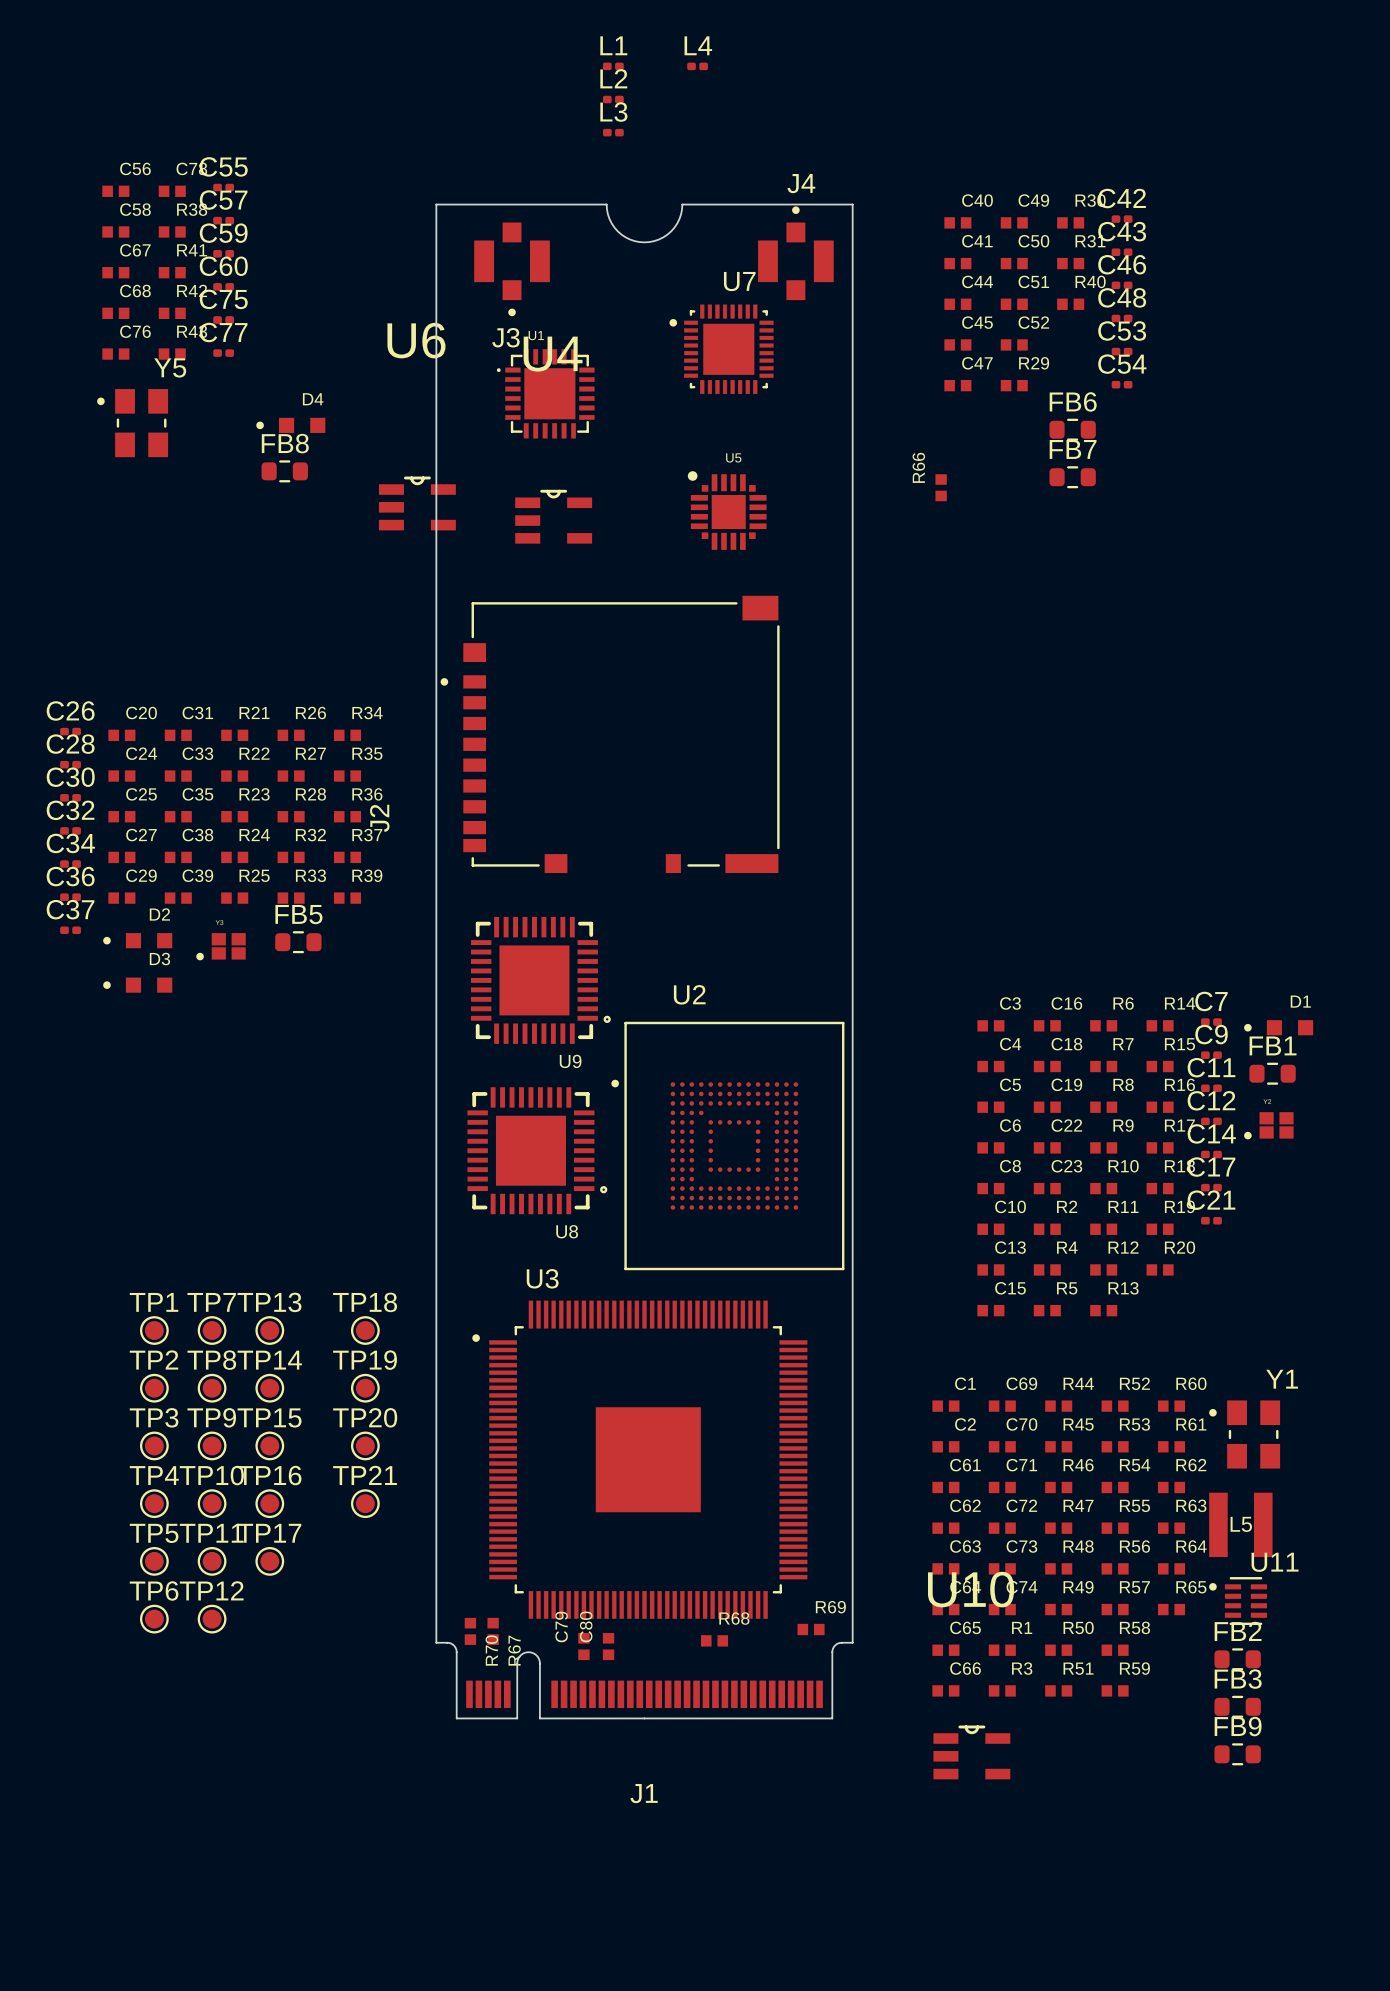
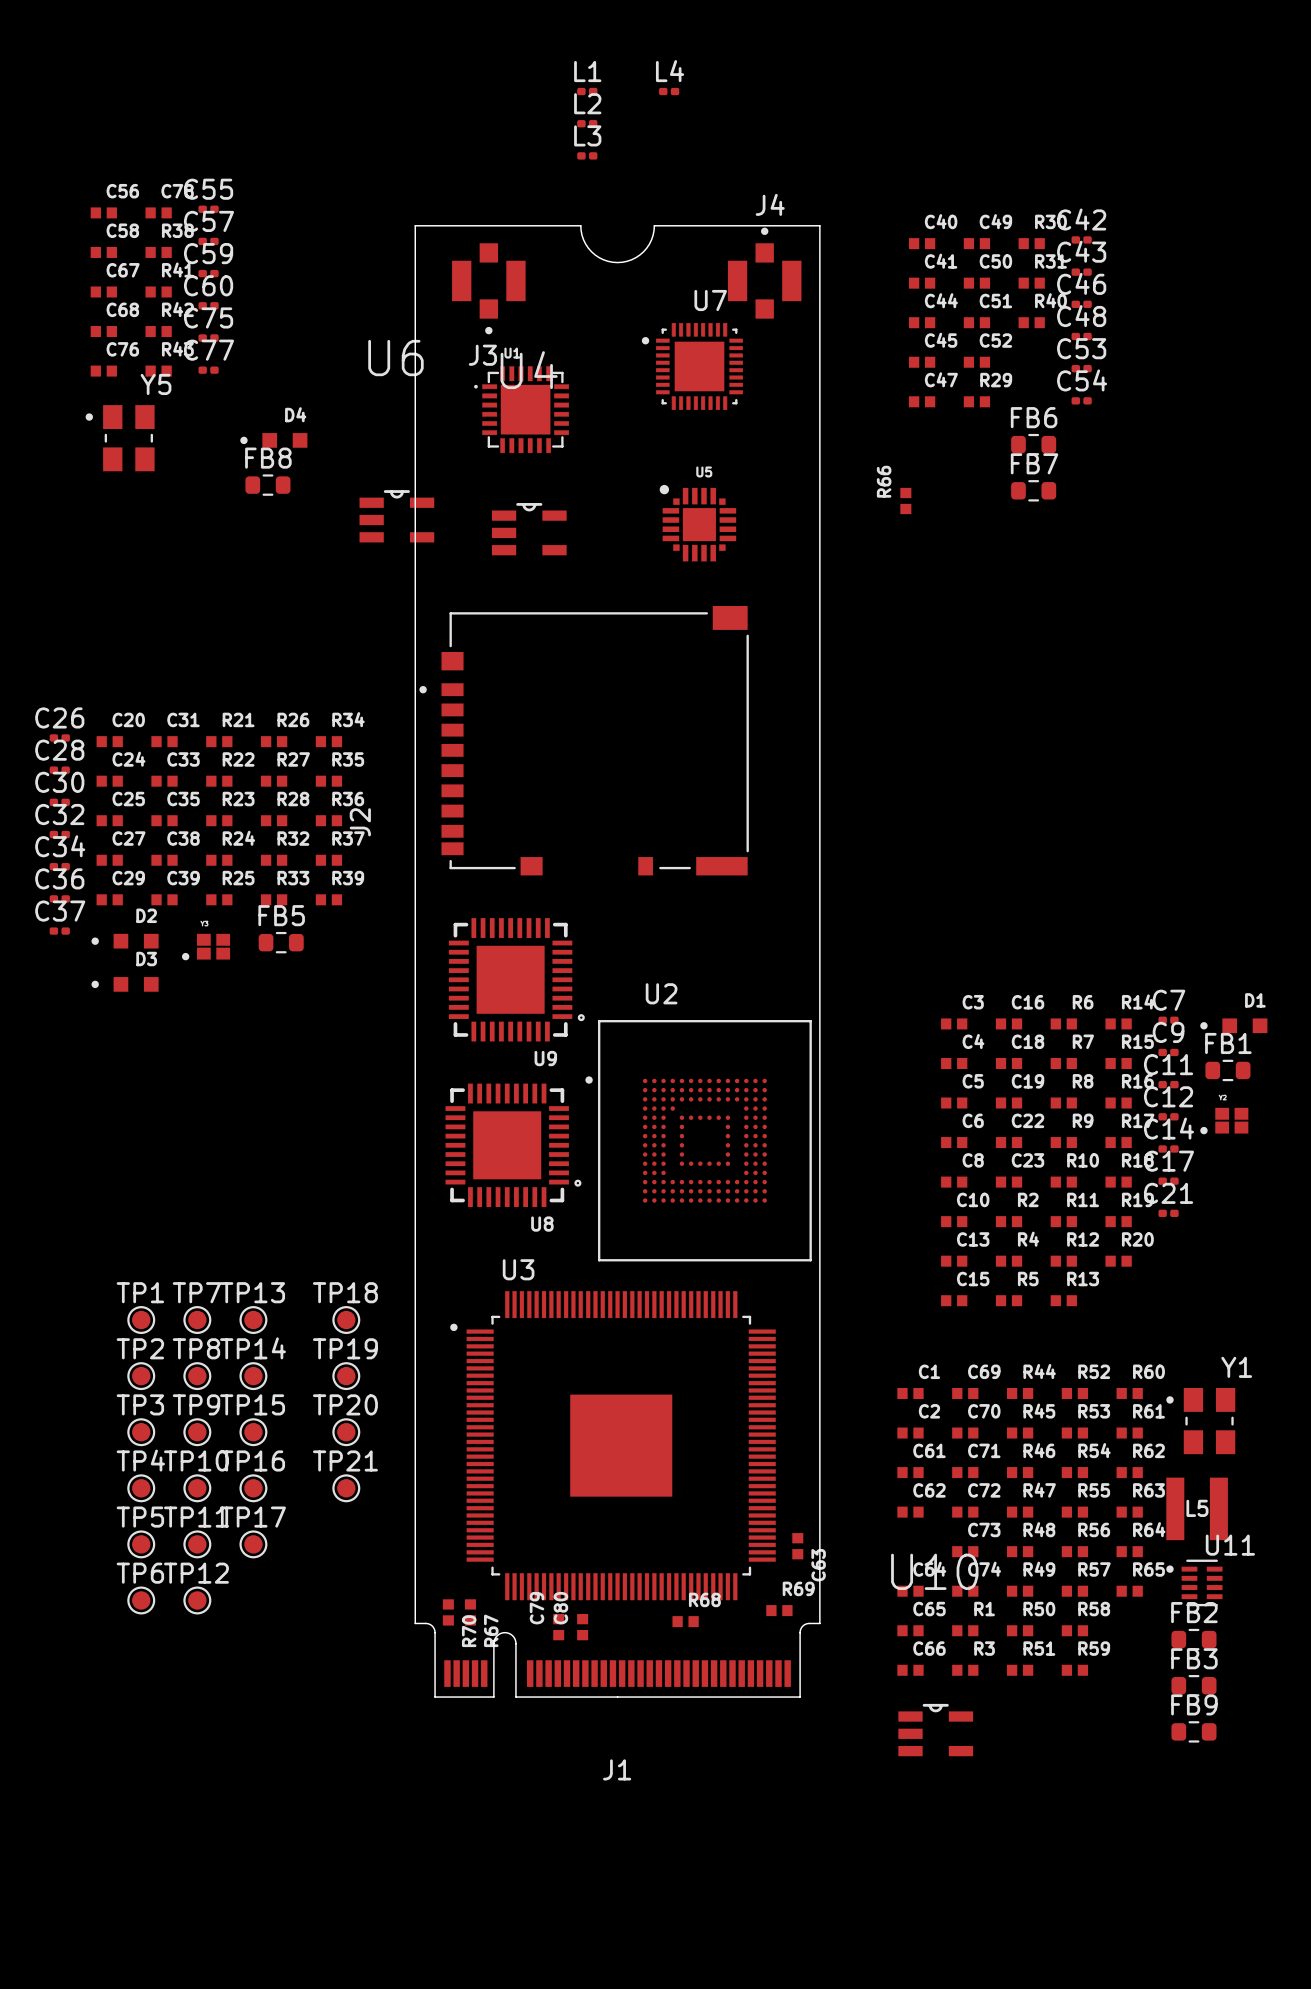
C63 rotation: 0° (945, 1568) -> 90° clockwise (797, 1546)
C63 position: (945, 1568) -> (797, 1546)

